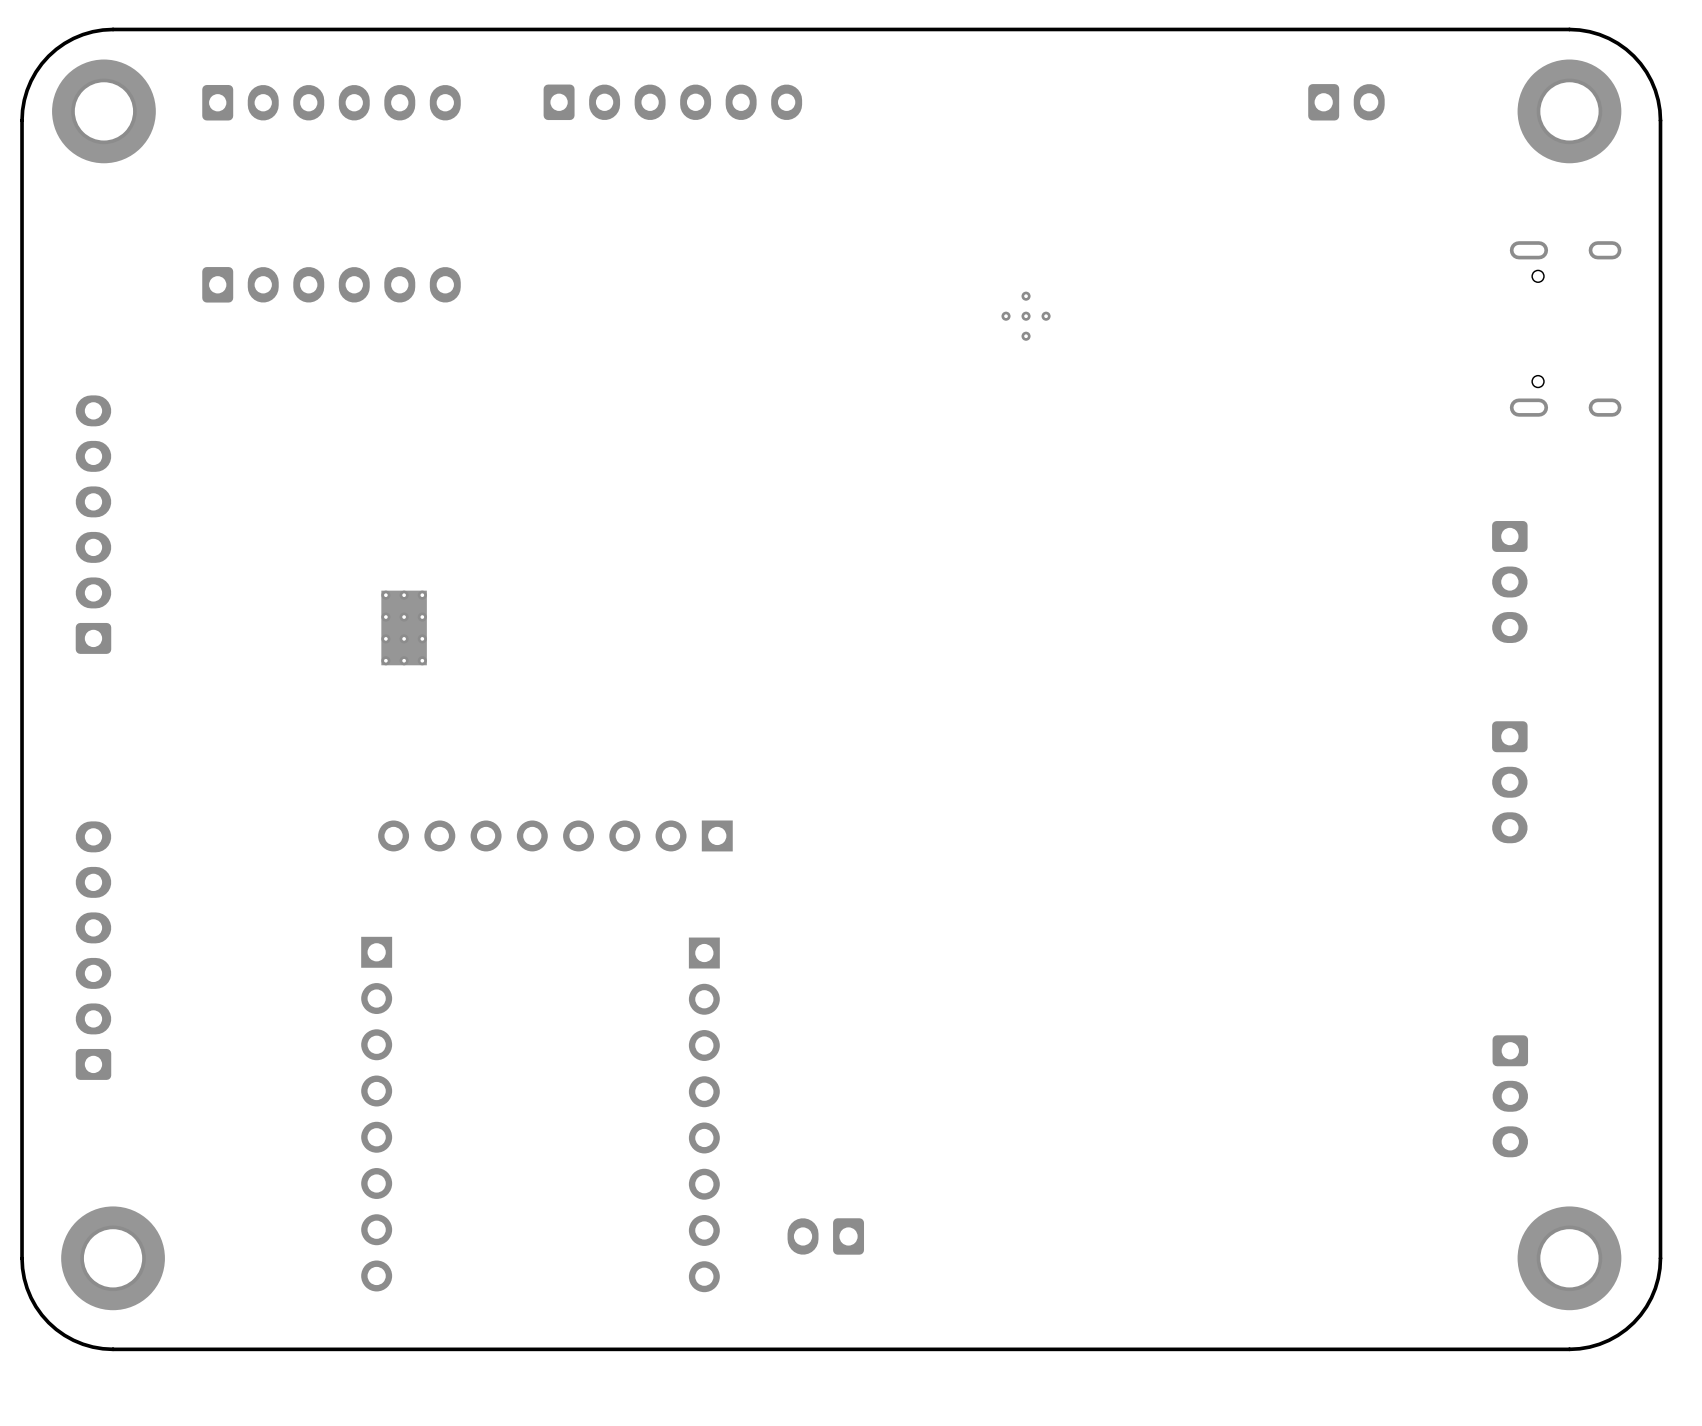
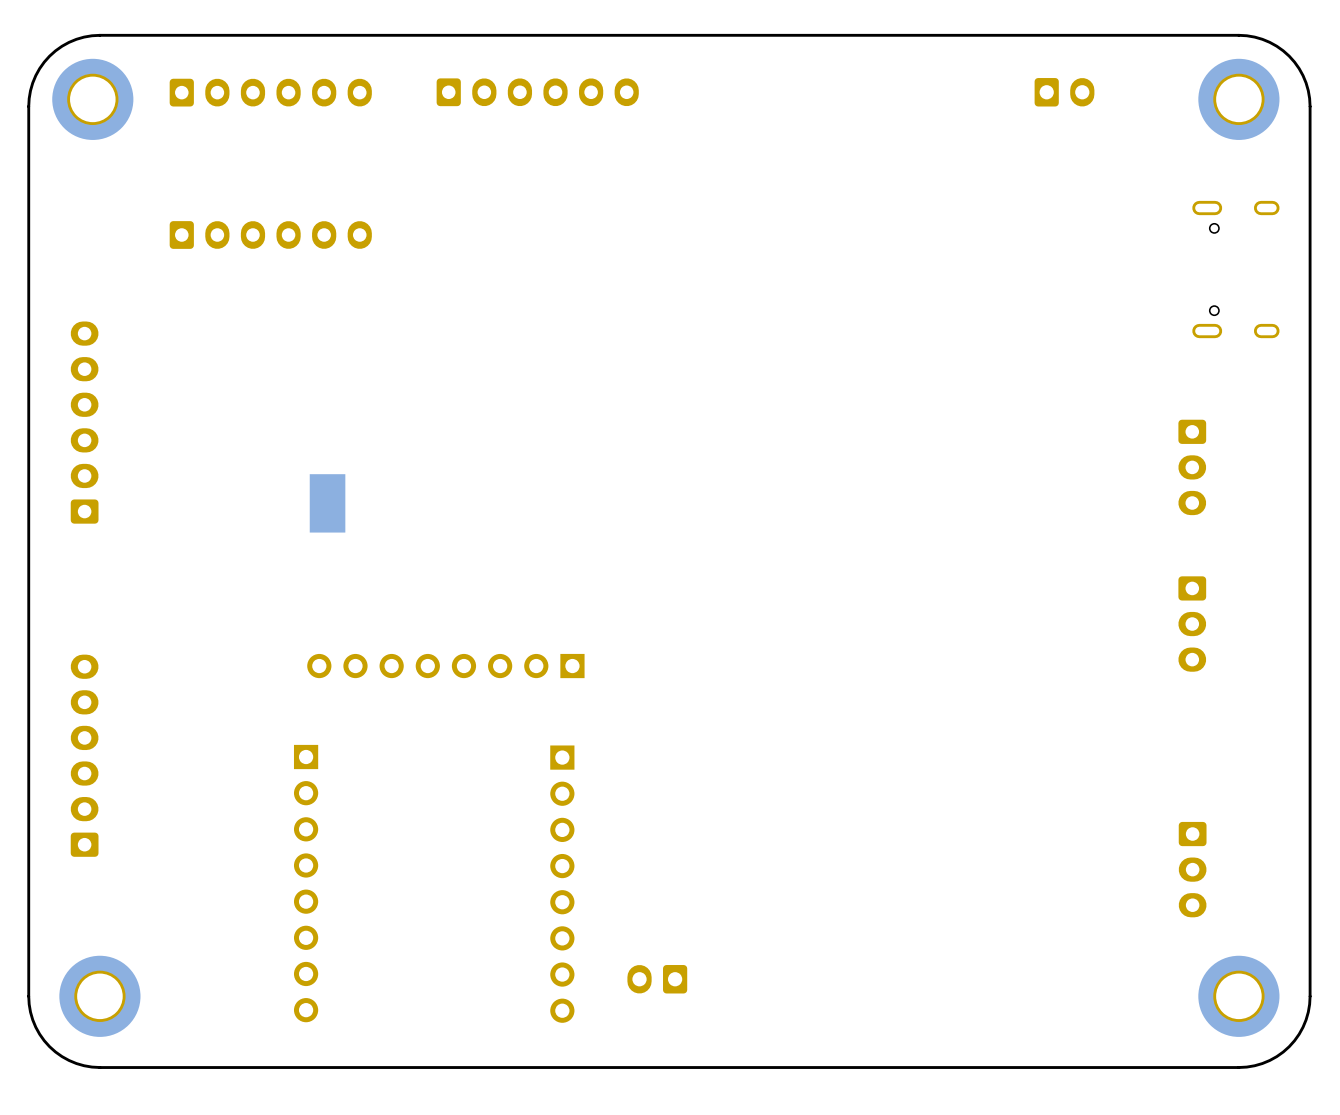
part: (1026, 316) -> none
part footprint: [381, 590, 427, 666] -> [309, 474, 346, 533]

